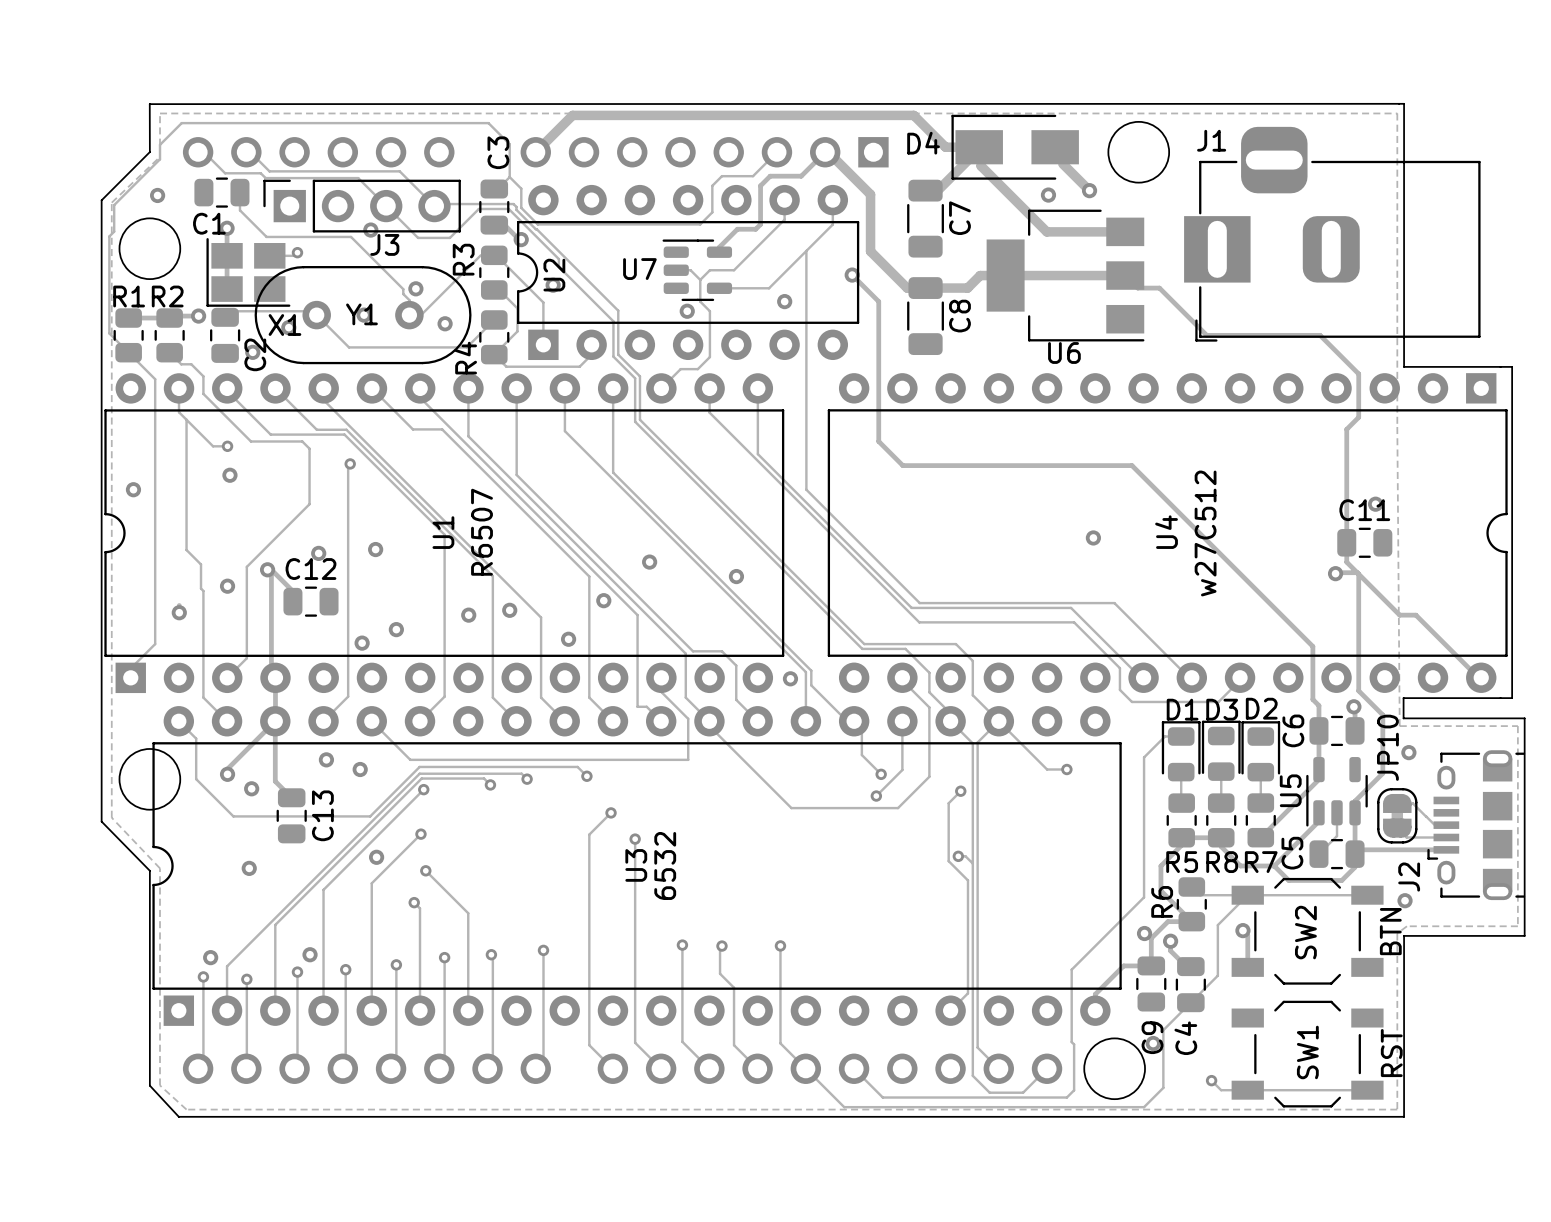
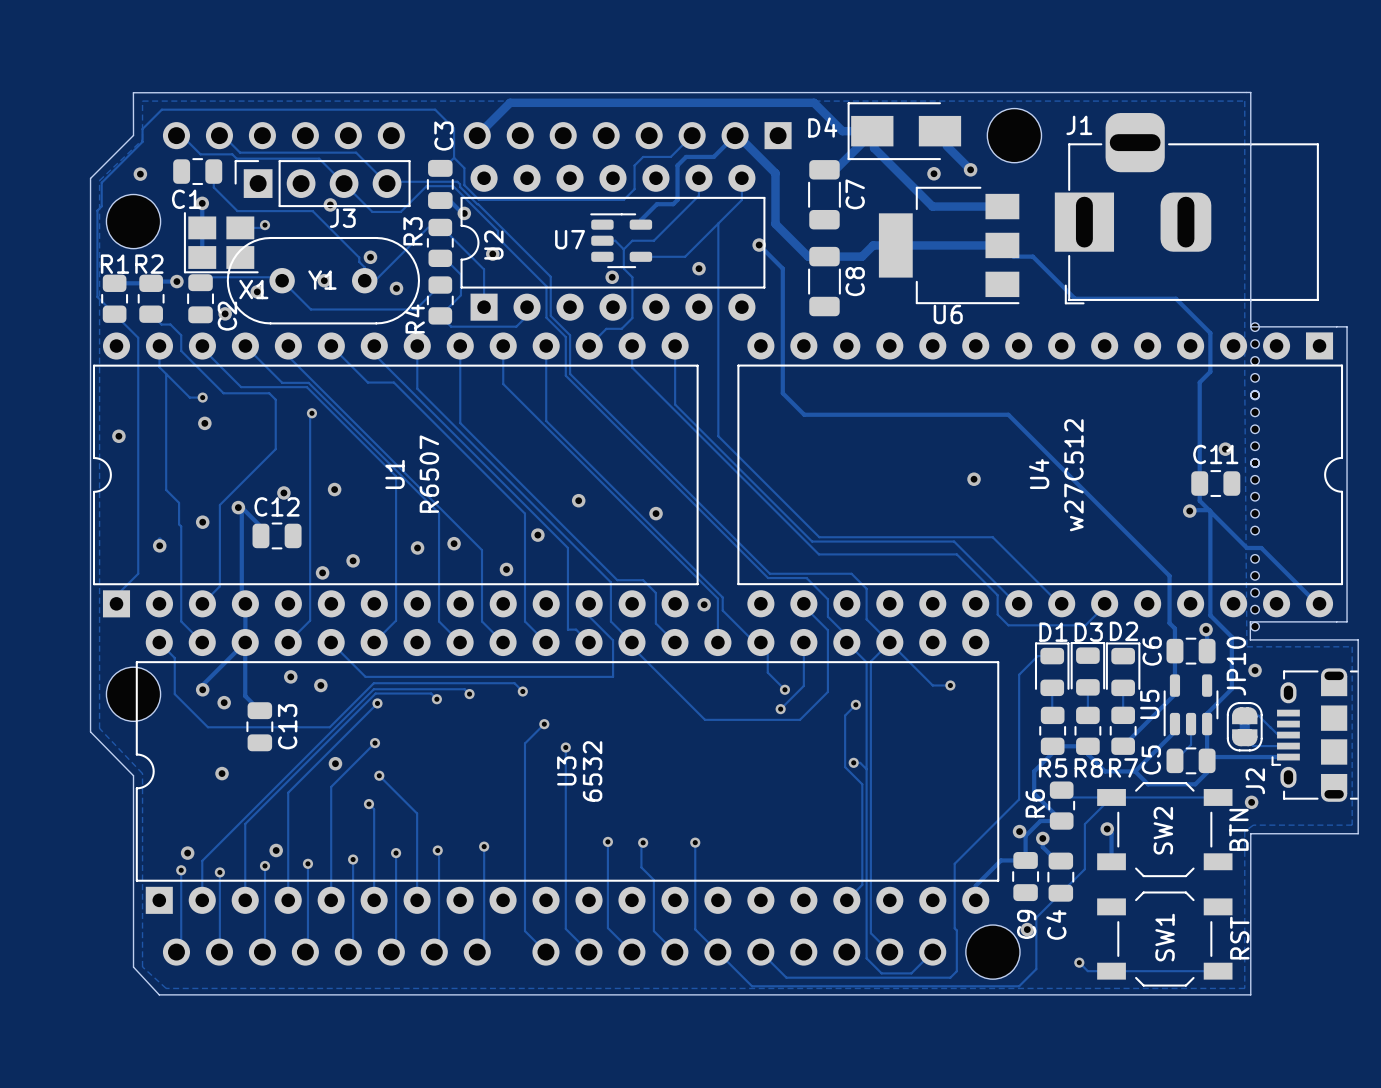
part: none -> (1255, 360)
part: none -> (1255, 429)
part: none -> (1255, 496)
part: none -> (1255, 592)

